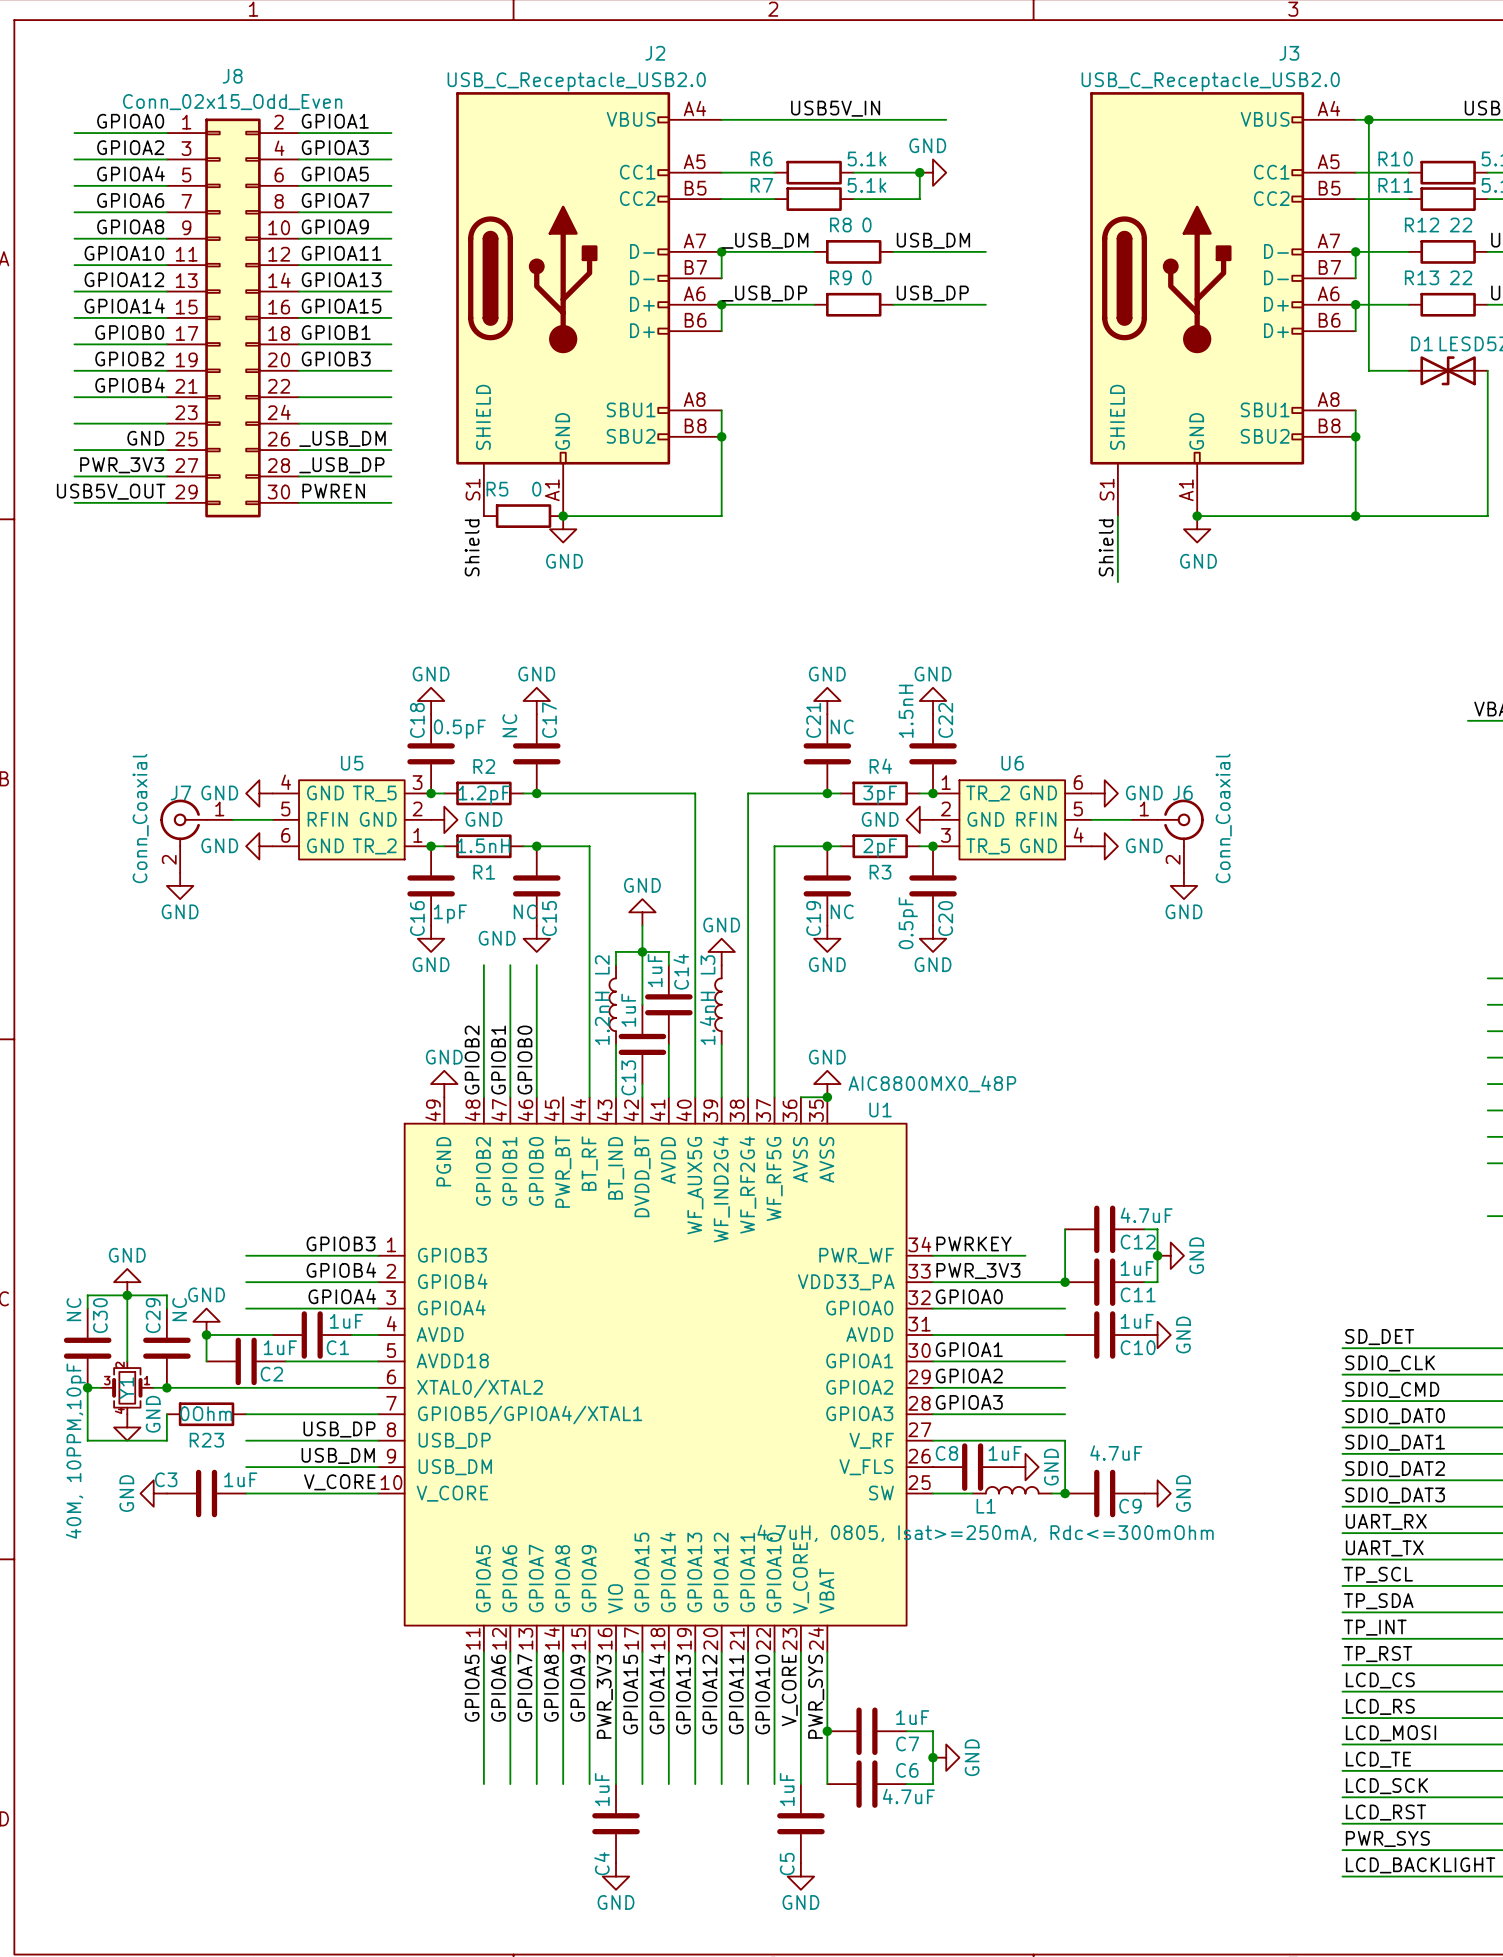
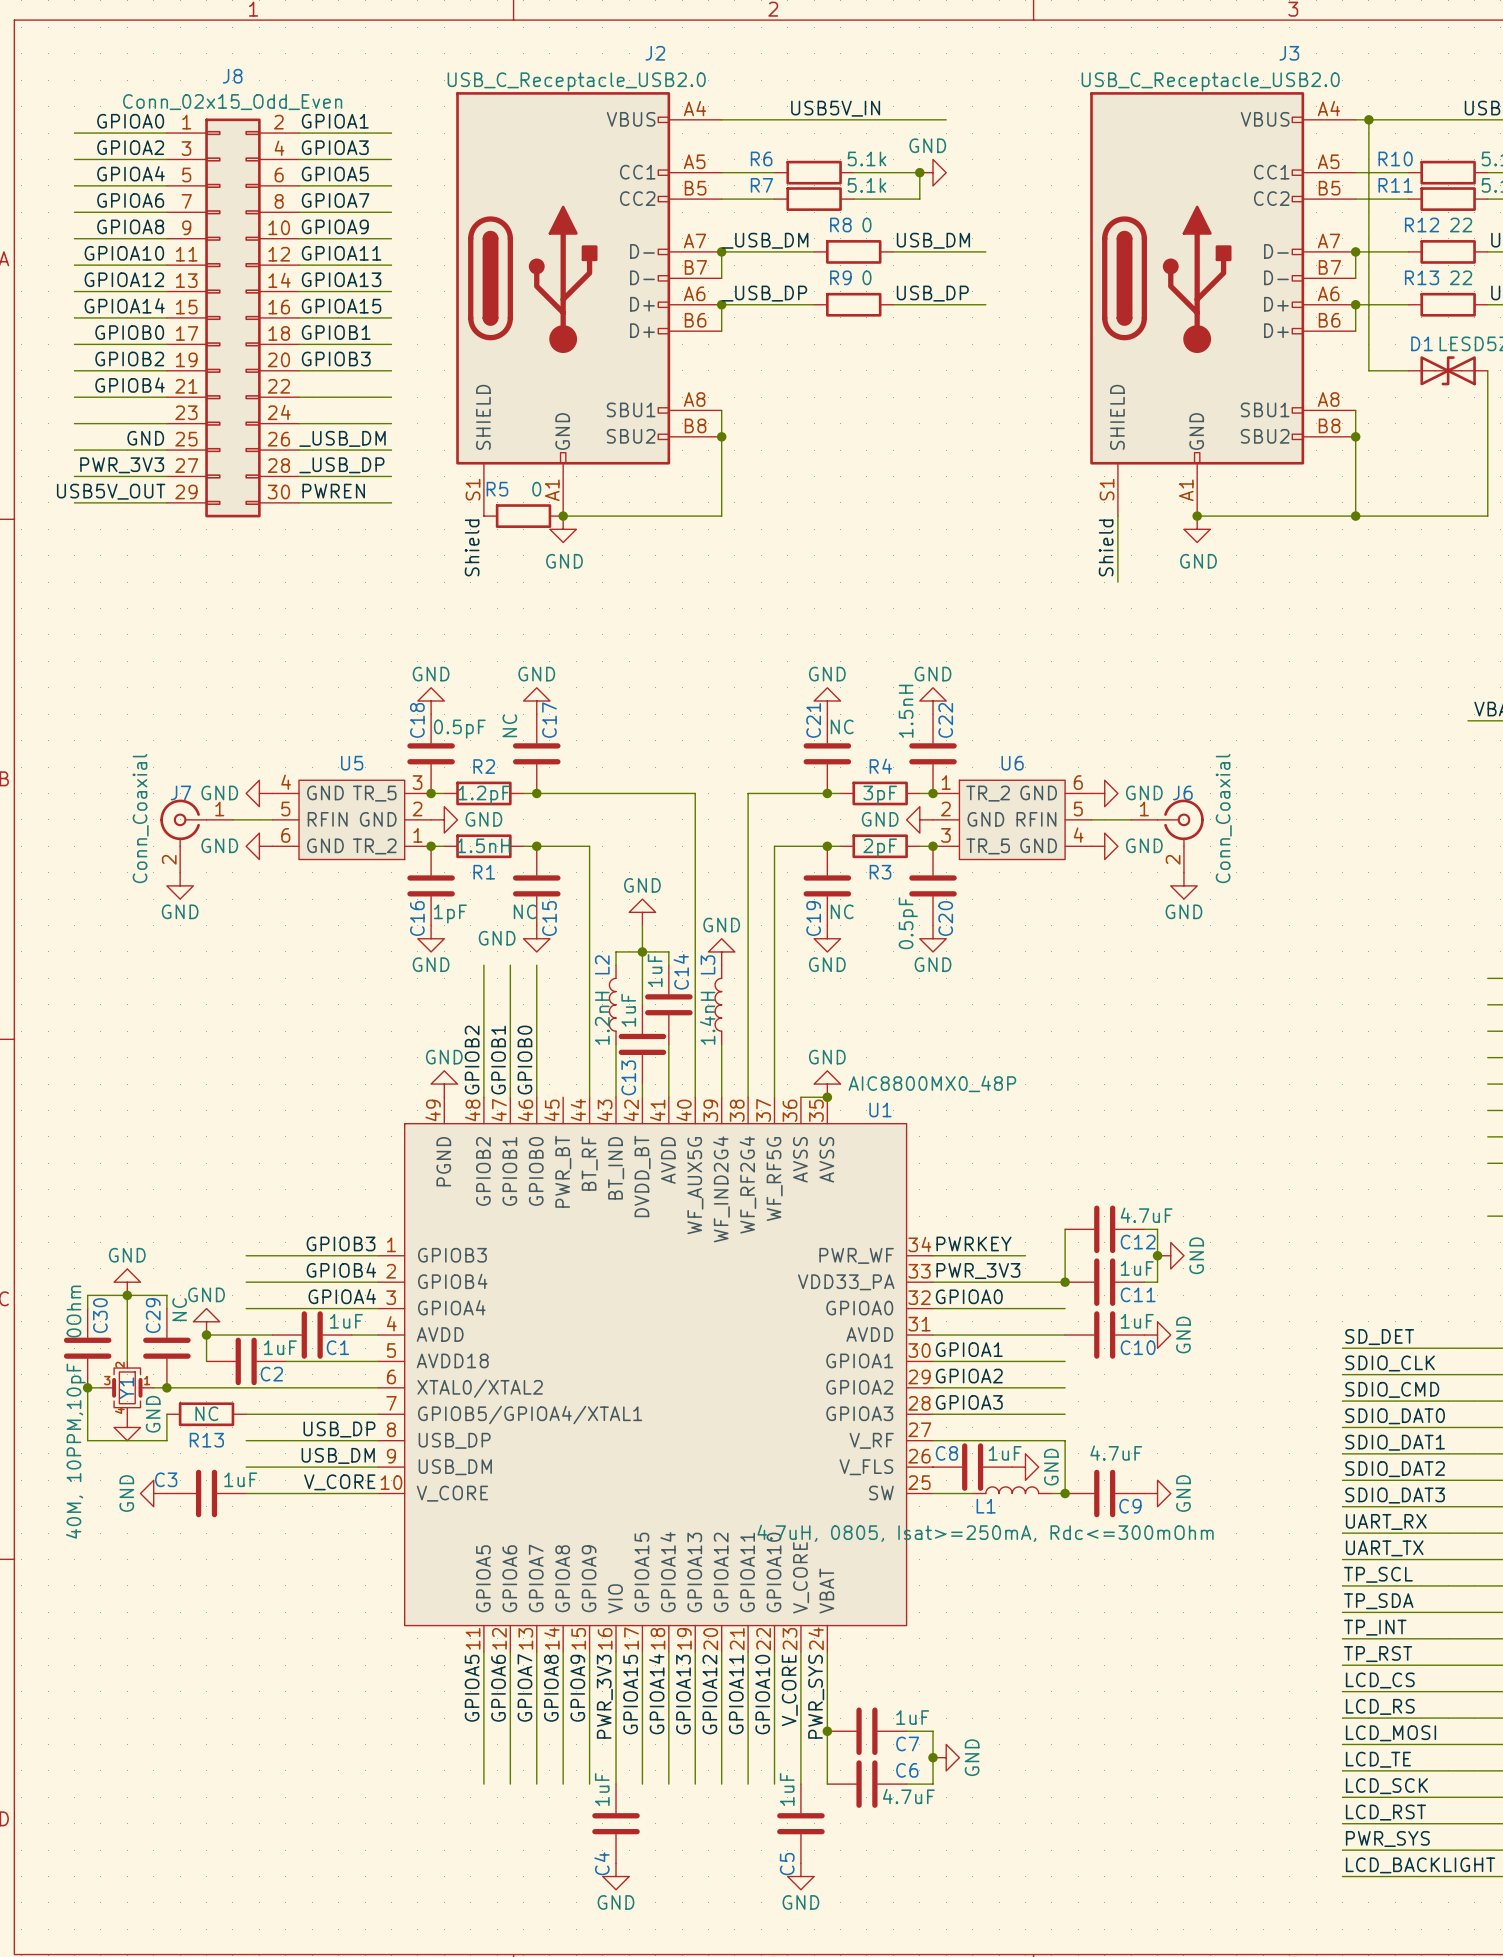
C30 value: NC (73, 1309) -> 0Ohm (73, 1311)
R23 value: 0Ohm (206, 1413) -> NC (206, 1413)
R23 name: R23 (206, 1440) -> R13 (206, 1440)

